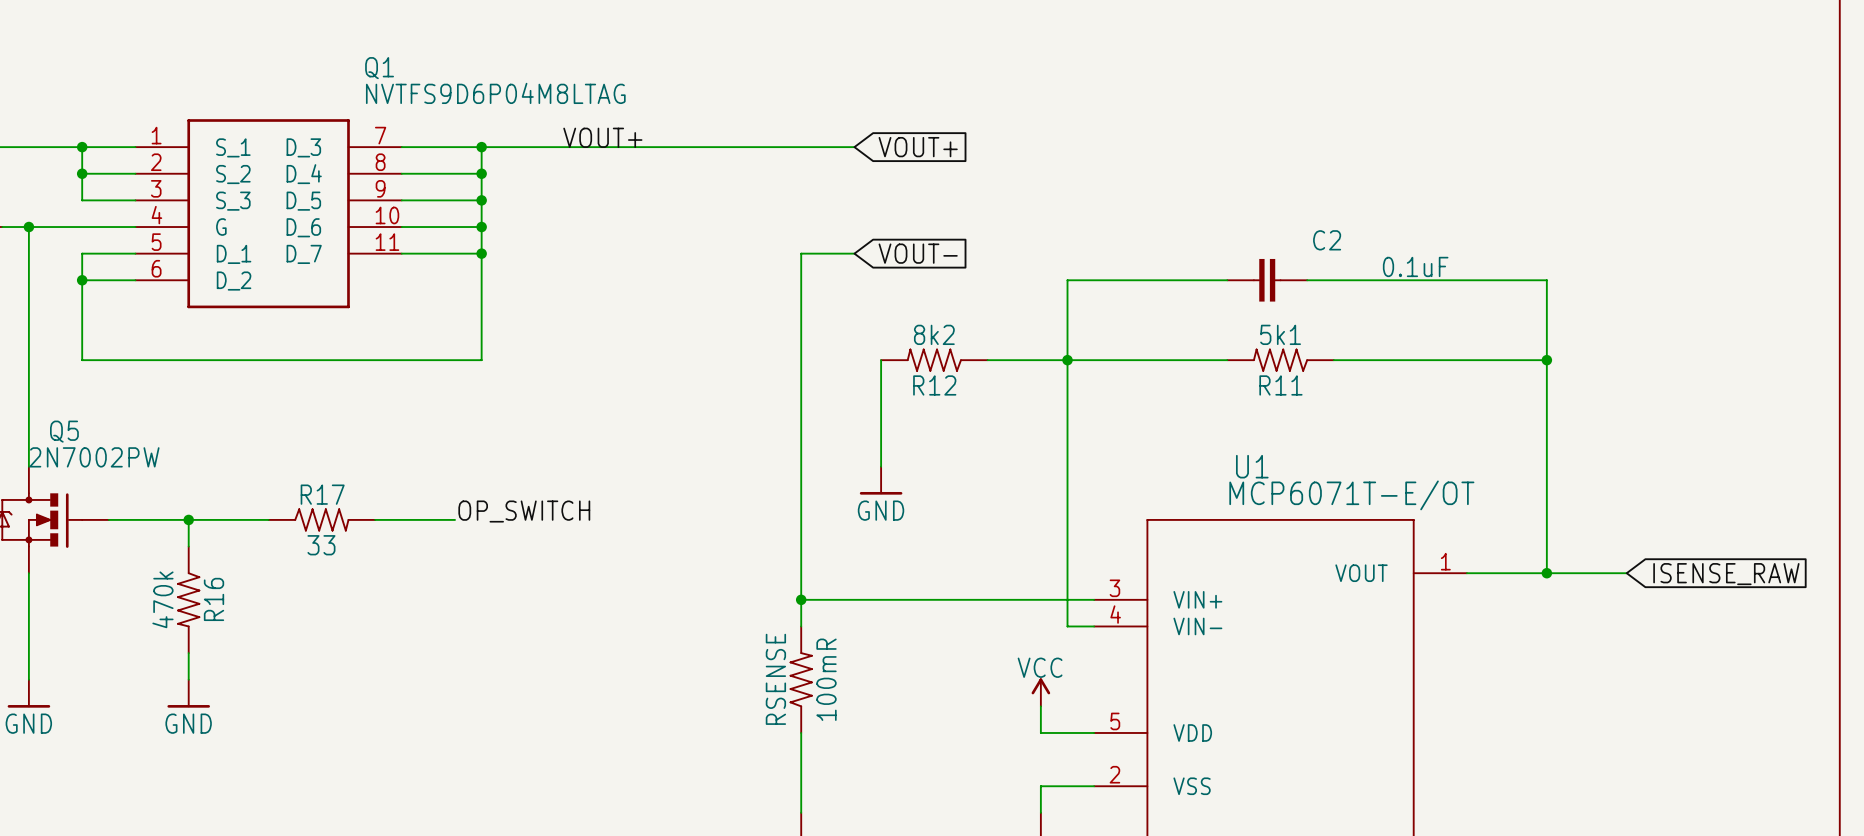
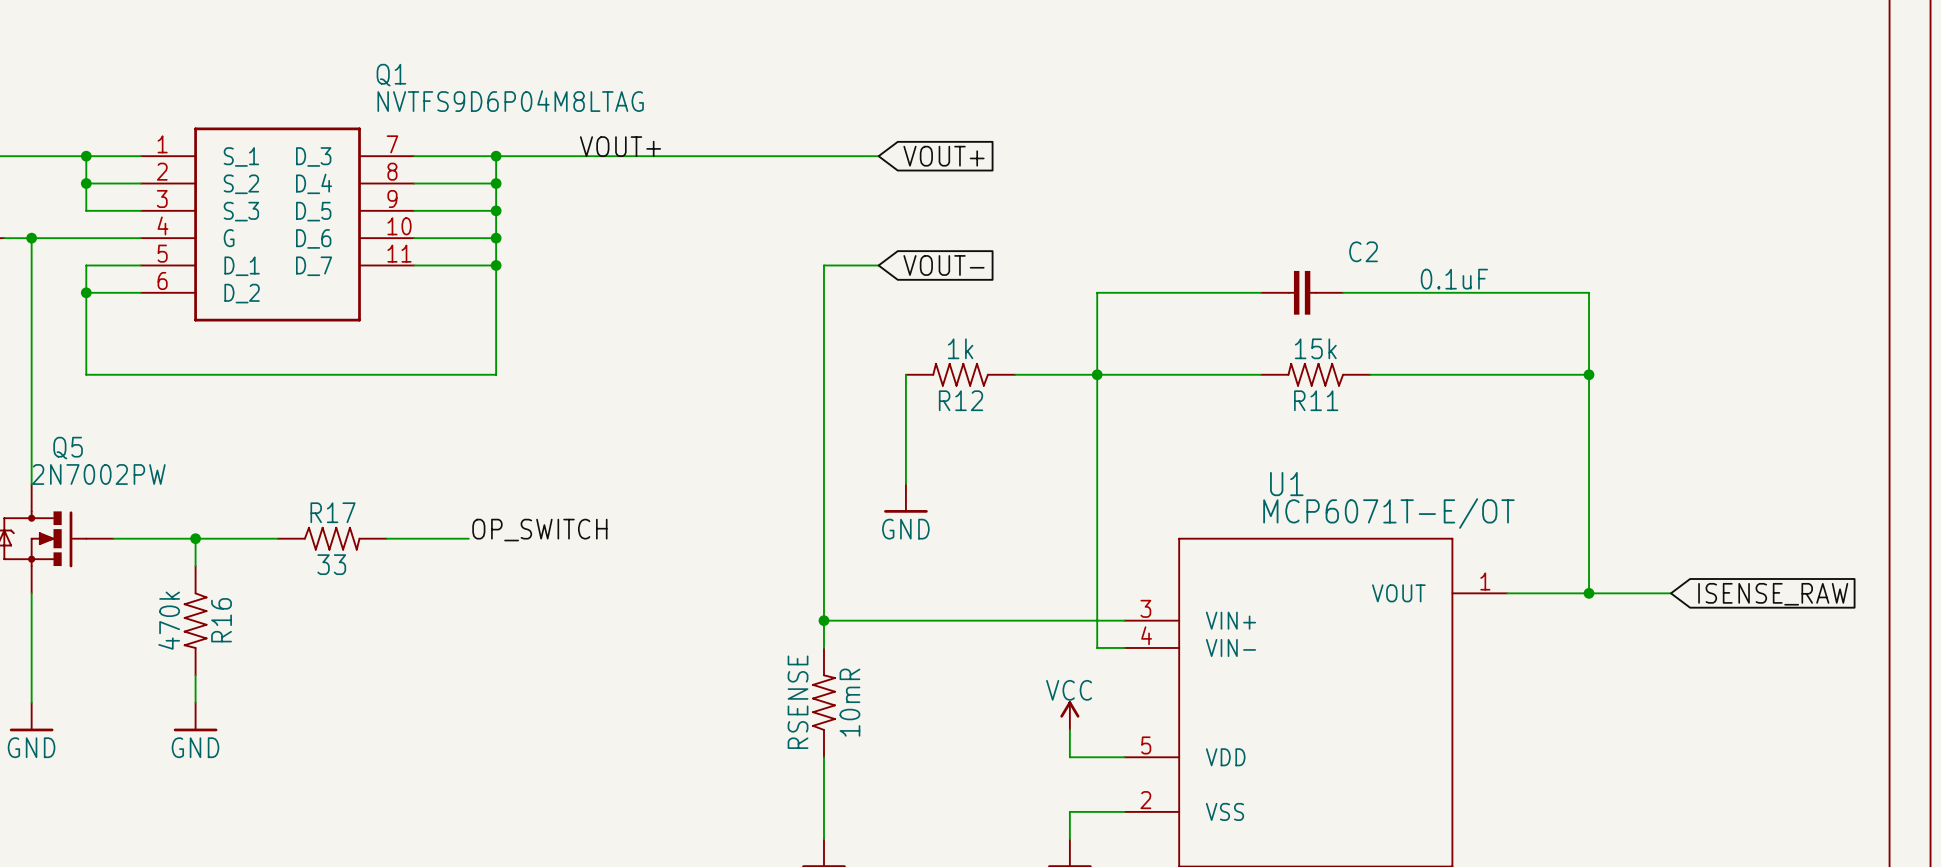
R12 value: 8k2 (934, 334) -> 1k (960, 348)
R11 value: 5k1 (1280, 334) -> 15k (1315, 348)
RSENSE value: 100mR (826, 679) -> 10mR (849, 702)

